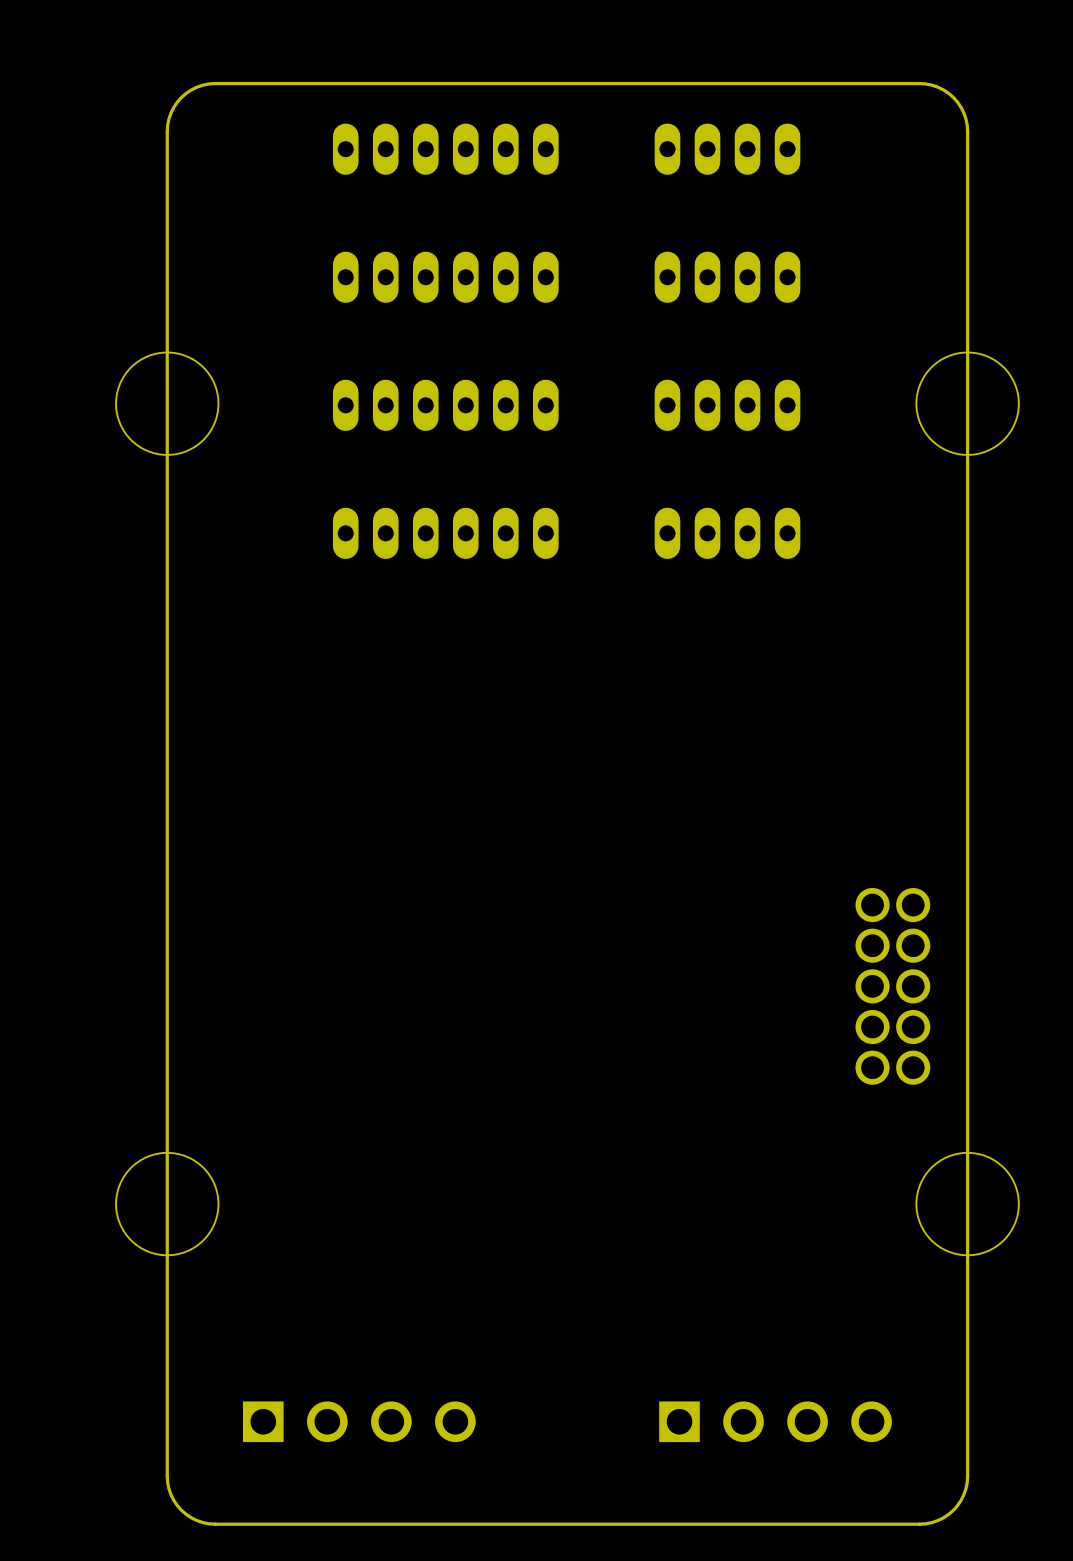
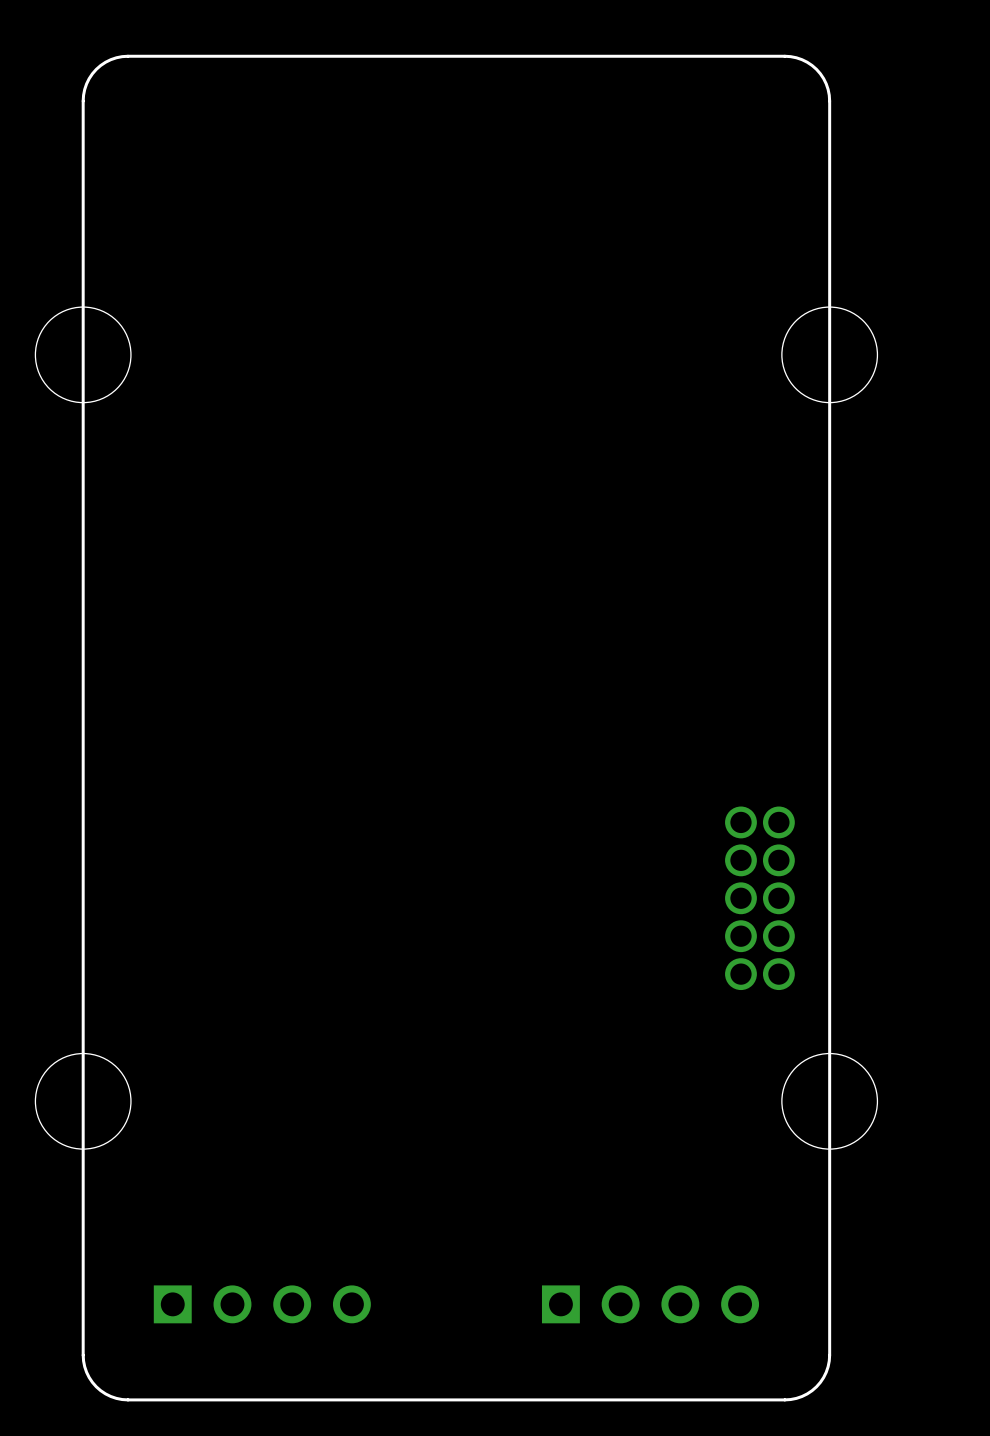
part: (445, 149) -> none
part: (727, 149) -> none
part: (445, 277) -> none
part: (727, 277) -> none
part: (445, 405) -> none
part: (727, 405) -> none
part: (445, 533) -> none
part: (727, 533) -> none

